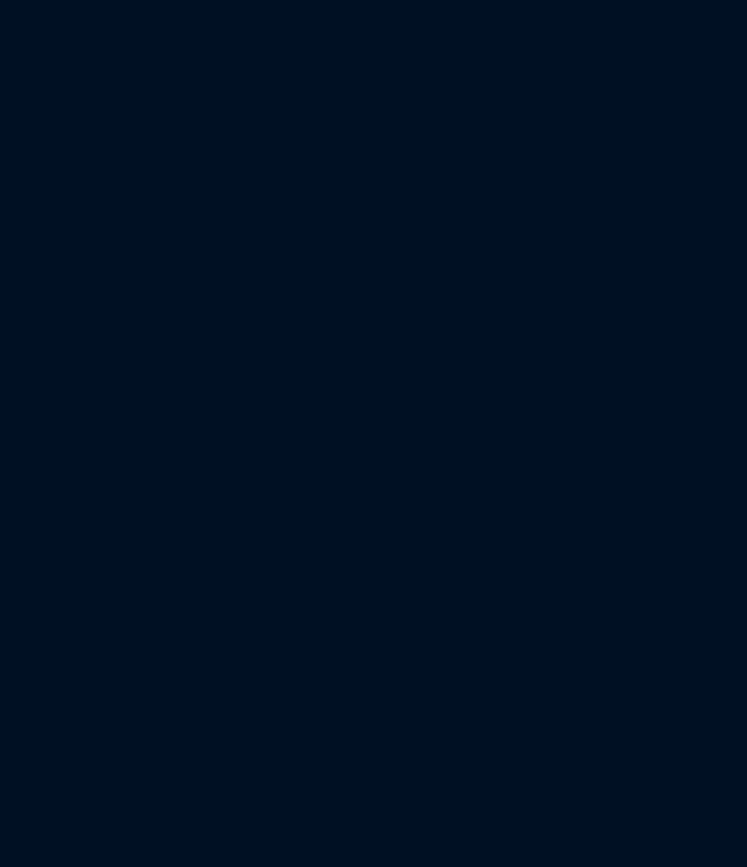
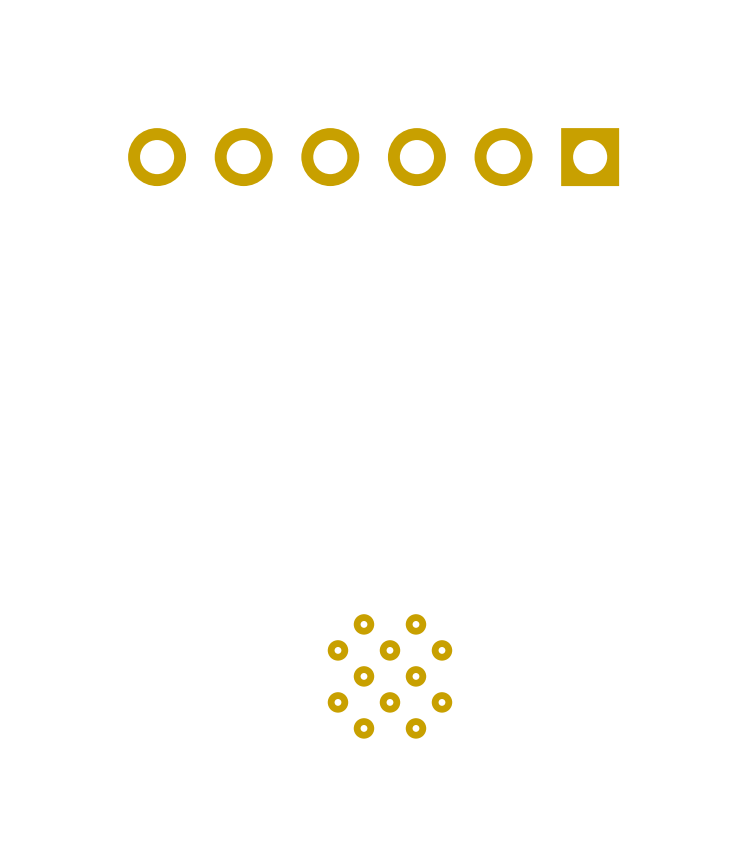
part: none -> (373, 157)
part: none -> (389, 676)

